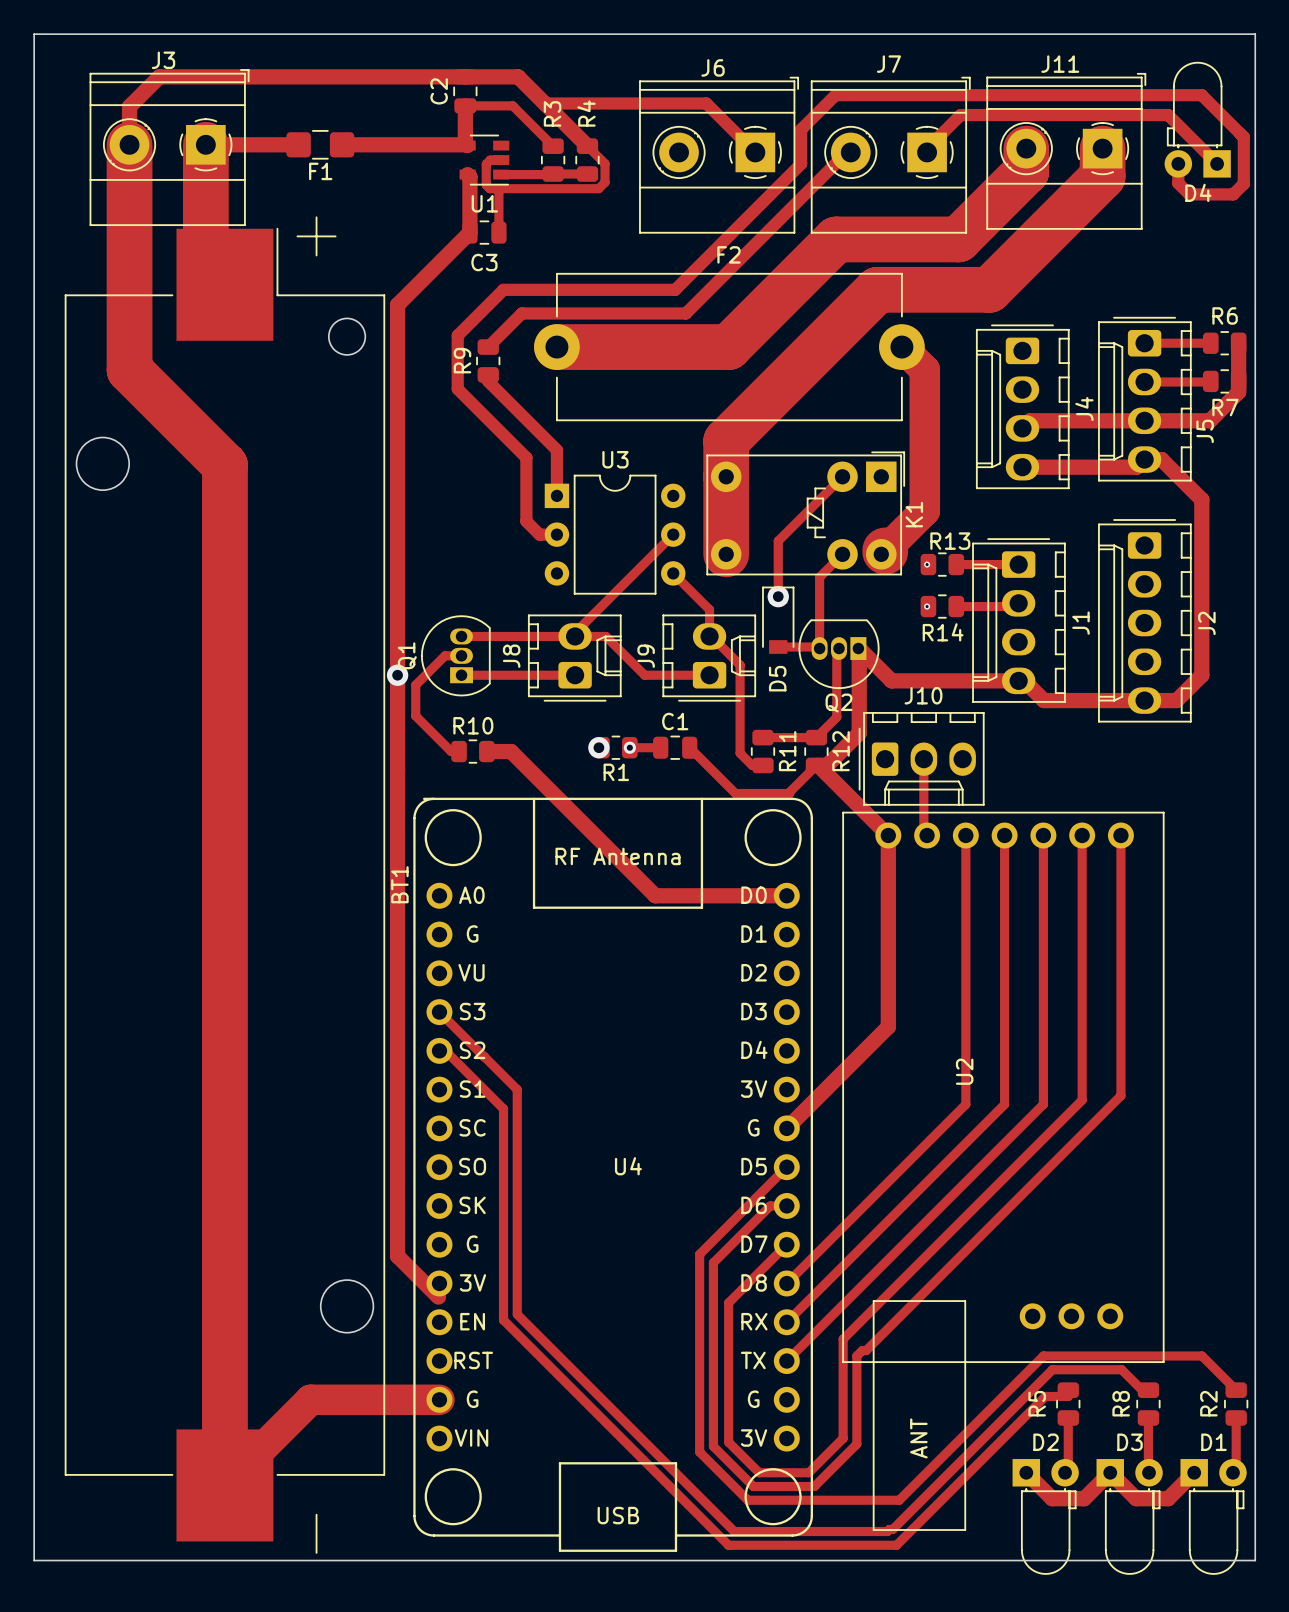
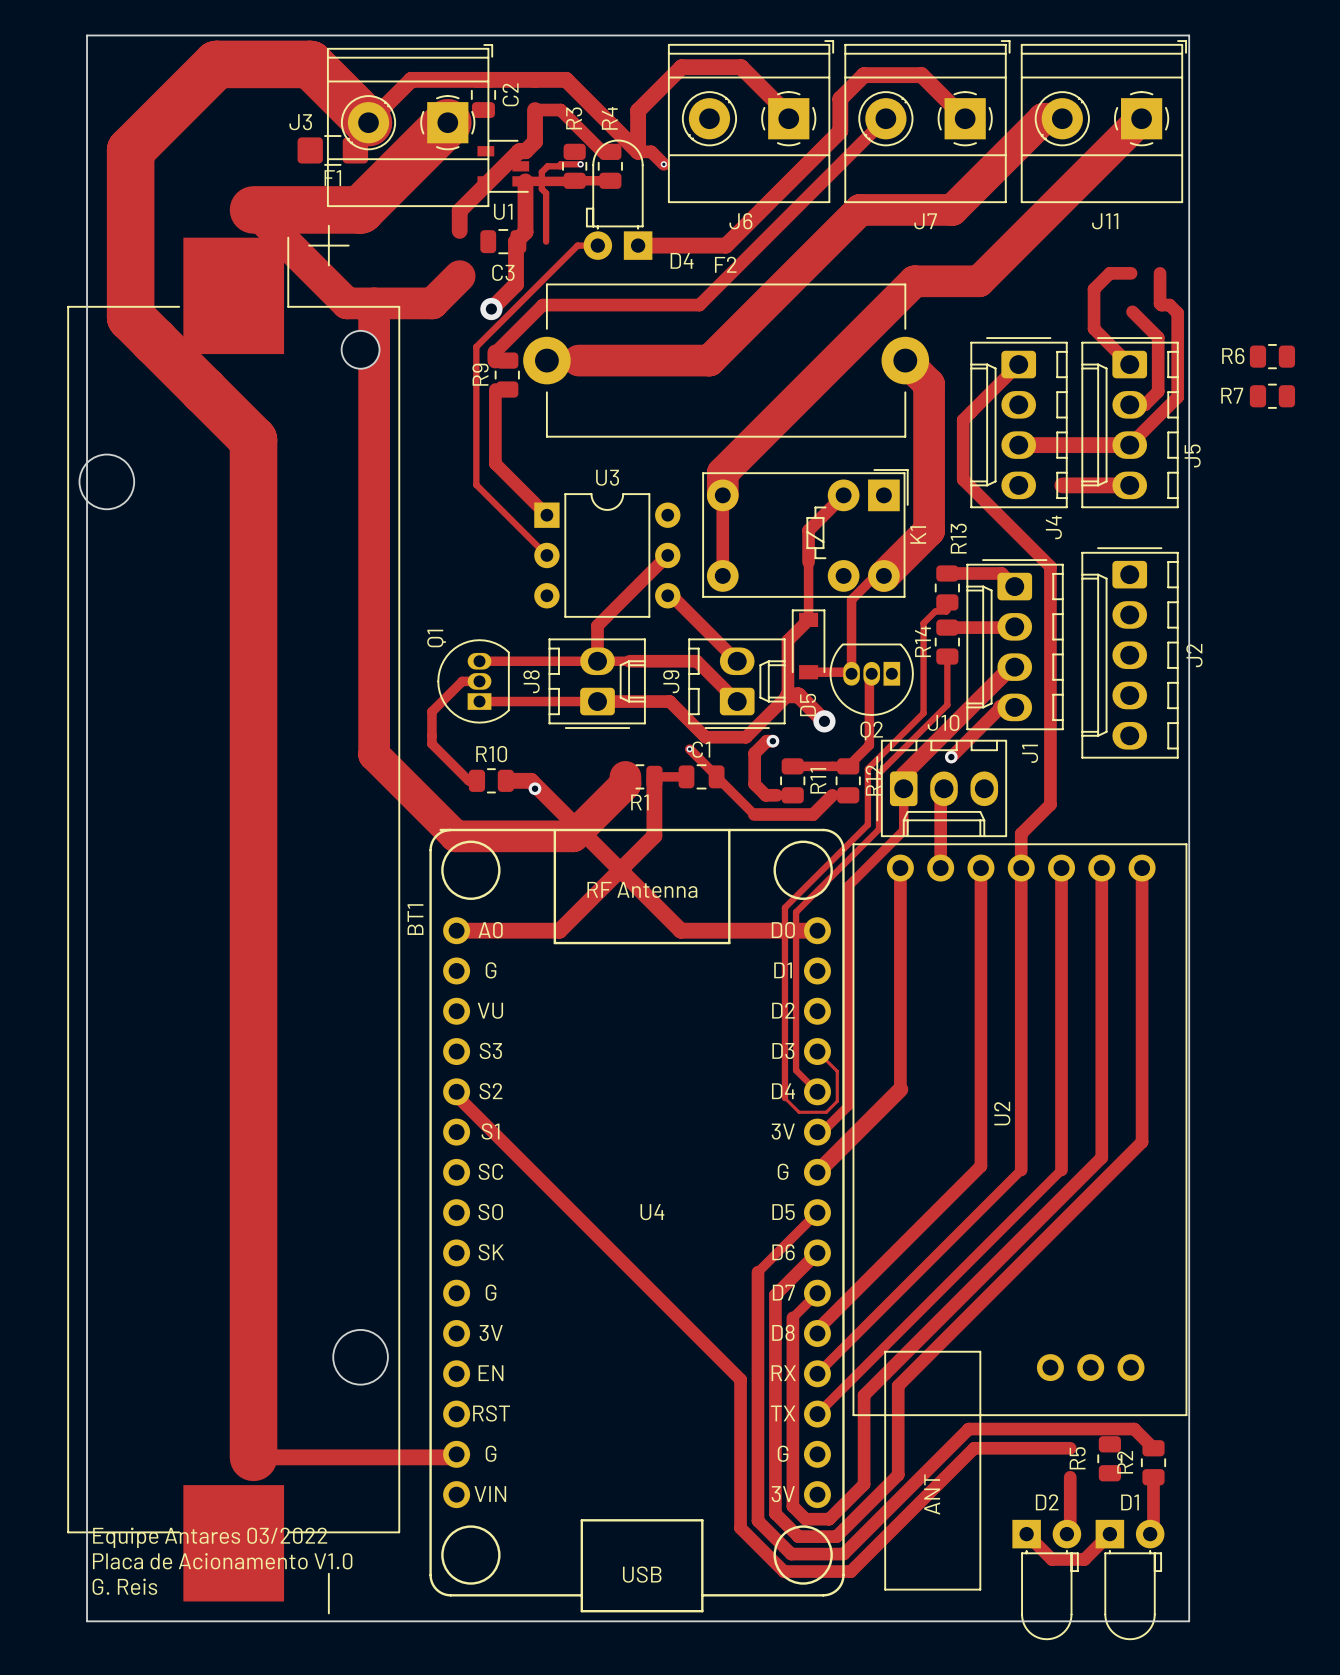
board edge: (83, 34) (34, 34) (34, 1560) (83, 1560) -> (87, 35) (87, 1621)
board edge: (1144, 34) (1255, 34) (1255, 1560) (1144, 1560) -> (1189, 35) (1189, 1621)
J3 name position: J3 (163, 60) -> J3 (300, 122)
J7 name position: J7 (888, 64) -> J7 (925, 221)
J11 name position: J11 (1060, 64) -> J11 (1105, 221)
J6 name position: J6 (713, 67) -> J6 (740, 221)
track: (395, 76) (159, 76) (129, 106) (129, 369) (224, 465) (224, 1485) (310, 1399) (439, 1399) -> (411, 79) (368, 122) (310, 64) (216, 64) (130, 150) (130, 317) (253, 440) (253, 1457) (453, 1457) (456, 1454)
track: (518, 76) (605, 163) (605, 182) (598, 188) (489, 188) (486, 185) (486, 164) (490, 160) (501, 160) -> (538, 79) (566, 79) (638, 151)
C2 name position: C2 (439, 91) -> C2 (510, 94)
track: (544, 103) (706, 103) (751, 148) -> none
track: none -> (788, 118) (788, 114) (741, 67) (681, 67) (638, 110) (638, 151)
track: none -> (885, 118) (699, 305) (542, 305) (495, 352) (495, 360)
track: none -> (965, 118) (921, 75) (864, 75) (840, 98) (840, 131) (725, 245) (638, 245) (642, 241)
track: none -> (1141, 118) (979, 281) (914, 281) (722, 472) (722, 575)
track: none -> (447, 122) (360, 209) (253, 209) (347, 303) (432, 303) (459, 276)
D4 position: (1197, 119) -> (617, 199)
track: (298, 144) (205, 144) (205, 265) (224, 284) -> none
track: (342, 144) (466, 144) -> none
track: (467, 145) (465, 143) (465, 105) (512, 105) (553, 146) -> none
track: none -> (602, 151) (560, 110) (535, 110) (535, 141) (525, 151) (519, 151) (459, 210) (459, 230)
track: none -> (638, 151) (651, 151) (663, 164)
J3 position: (169, 147) -> (410, 125)
track: (850, 148) (685, 313) (521, 313) (488, 347) -> none
track: (927, 148) (960, 115) (1168, 115) (1217, 163) -> none
track: (1026, 148) (1026, 171) (958, 239) (836, 239) (728, 347) (682, 347) -> (1062, 118) (1043, 118) (952, 209) (860, 209) (709, 360)
track: (1102, 148) (1102, 176) (989, 289) (877, 289) (726, 441) (726, 554) -> none
J11 position: (1066, 151) -> (1103, 121)
J6 position: (719, 155) -> (751, 121)
J7 position: (890, 155) -> (927, 121)
track: none -> (580, 164) (547, 166) (541, 172) (541, 188) (546, 193) (546, 241)
via: none -> (580, 164)
via: none -> (663, 164)
track: (1178, 163) (1178, 183) (1189, 194) (1233, 194) (1243, 183) (1243, 137) (1201, 95) (835, 95) (801, 129) (801, 163) (675, 289) (503, 289) (457, 335) (457, 389) (526, 457) (526, 521) (539, 534) (556, 534) -> none
track: (467, 174) (469, 176) (469, 232) (397, 304) (397, 1256) (438, 1297) -> none
track: none -> (525, 181) (525, 232) (515, 241) (515, 284) (491, 309)
track: (493, 188) (498, 193) (498, 232) -> none
D4 name position: D4 (1198, 192) -> D4 (682, 260)
track: none -> (597, 245) (577, 245) (476, 346) (476, 484) (546, 555)
track: none -> (1131, 273) (1109, 273) (1094, 289) (1094, 328) (1129, 364)
track: none -> (1160, 273) (1160, 303) (1169, 305) (1177, 313) (1177, 397) (1129, 445) (1018, 445)
track: none -> (374, 303) (374, 754) (455, 836) (573, 836) (625, 784) (625, 776)
via: none -> (491, 309)
track: none -> (1132, 311) (1158, 337) (1158, 391) (1144, 404) (1129, 404)
R6 name position: R6 (1225, 315) -> R6 (1233, 356)
track: (1144, 343) (1210, 343) -> none
track: (1238, 343) (1238, 392) (1209, 420) (1030, 420) (1022, 428) -> none
track width: thick (556, 347) (682, 347) -> thin (578, 360) (709, 360)
F2 position: (729, 347) -> (726, 360)
track: none -> (905, 360) (929, 384) (929, 530) (883, 575)
track: (901, 347) (924, 369) (924, 510) (885, 551) -> none
track: none -> (495, 389) (495, 463) (546, 515)
track: (488, 374) (488, 381) (556, 450) (556, 495) -> none
track: (1210, 381) (1144, 382) -> none
J5 position: (1144, 399) -> (1130, 422)
J4 position: (1022, 406) -> (1019, 422)
R7 name position: R7 (1225, 407) -> R7 (1232, 395)
J4 name position: J4 (1084, 409) -> J4 (1053, 527)
track: (1087, 467) (1136, 467) (1144, 459) (1161, 459) (1201, 499) (1201, 675) (1176, 700) (1044, 700) (1024, 680) (976, 680) -> none
track: (842, 476) (778, 541) -> (843, 495) (808, 530) (808, 562)
K1 position: (805, 513) -> (805, 533)
U3 position: (615, 534) -> (607, 555)
track: none -> (667, 555) (597, 625) (597, 661)
track: (673, 534) (575, 632) -> none
track: none -> (947, 573) (1001, 573) (1014, 586)
via: (927, 564) -> none
R13 rotation: 0° (942, 564) -> 90° clockwise (947, 587)
R13 position: (942, 564) -> (947, 587)
track: (956, 564) (1018, 564) -> none
track: none -> (667, 595) (671, 595) (737, 661)
track: (673, 573) (709, 609) (709, 636) (740, 665) (740, 753) (752, 765) (763, 765) -> none
track: none -> (947, 602) (946, 611) (935, 611) (923, 623) (923, 713) (867, 768) (867, 824) (784, 907) (784, 1098) (799, 1112) (826, 1112) (837, 1101) (837, 1071) (817, 1051)
track: none -> (808, 619) (787, 640) (787, 695)
via: (778, 596) -> none
track: none -> (1014, 626) (947, 627)
track: (1018, 603) (1015, 606) (956, 606) -> none
via: (927, 606) -> none
R14 rotation: 0° (942, 606) -> 90° clockwise (947, 642)
R14 position: (942, 606) -> (947, 642)
J1 position: (1018, 620) -> (1015, 644)
J2 position: (1144, 620) -> (1130, 652)
J1 name position: J1 (1080, 623) -> J1 (1030, 753)
track: none -> (947, 656) (947, 705) (878, 773) (878, 829) (796, 912) (796, 1070) (817, 1091)
track: (605, 636) (644, 675) (709, 675) -> (629, 661) (696, 661) (737, 701)
track: none -> (1014, 667) (1011, 667) (903, 774) (903, 830) (848, 886) (848, 1105) (822, 1132) (817, 1132)
Q1 name position: Q1 (407, 655) -> Q1 (436, 638)
track: none -> (787, 695) (798, 695) (824, 721)
track: none -> (787, 695) (746, 737) (705, 737) (669, 701) (597, 701)
via: (397, 675) -> none
track: (963, 680) (891, 680) (859, 648) (859, 733) (827, 765) (816, 765) (789, 793) (735, 793) (725, 783) -> (832, 795) (813, 814) (754, 814)
track: none -> (1000, 707) (951, 757)
via: none -> (824, 721)
track: none -> (772, 741) (766, 741) (754, 753) (754, 784) (765, 795) (776, 795)
via: none -> (772, 741)
track: none -> (689, 749) (716, 776)
via: none -> (689, 749)
via: none -> (951, 757)
via: (598, 747) -> none
track: none -> (654, 776) (654, 835) (559, 930) (456, 930)
via: (629, 747) -> none
J10 position: (921, 758) -> (941, 788)
via: none -> (535, 788)
track: none -> (944, 788) (940, 792) (940, 868)
track: (923, 759) (923, 832) (927, 835) -> none
track: (818, 765) (888, 835) (888, 1026) (866, 1048) -> (900, 868) (900, 1089)
track: (965, 835) (965, 1104) (786, 1283) -> (980, 868) (980, 1166) (817, 1329) (817, 1333)
track: (1004, 835) (1004, 1104) (982, 1126) -> (1018, 364) (963, 420) (963, 479) (1050, 566) (1050, 804) (1021, 833) (1021, 1170)
track: (1043, 835) (1043, 1104) (1021, 1126) -> (1061, 868) (1061, 1170)
track: (1082, 835) (1082, 1100) (843, 1339) (843, 1438) (808, 1472) (759, 1472) (728, 1442) (728, 1302) (763, 1268) -> (1101, 868) (1101, 1157) (864, 1395) (864, 1484) (829, 1519) (805, 1519) (792, 1506) (792, 1317)
track: (1120, 835) (1120, 1095) (866, 1350) (862, 1350) (856, 1356) (856, 1444) (814, 1486) (753, 1486) (713, 1446) (713, 1262) (770, 1205) (786, 1205) -> (1142, 868) (1142, 1142) (898, 1385) (898, 1474) (836, 1536) (798, 1536) (775, 1513) (775, 1294) (817, 1252)
track: (439, 1012) (484, 1056) -> none
track: none -> (456, 1091) (456, 1095) (740, 1379) (740, 1528) (783, 1571) (850, 1571) (974, 1448) (1070, 1448)
track: (445, 1050) (503, 1108) (503, 1320) (728, 1545) (896, 1545) (1045, 1396) (1068, 1396) (1068, 1390) -> none
track: (484, 1056) (517, 1089) (517, 1314) (734, 1531) (887, 1531) (892, 1529) (1052, 1369) (1121, 1369) (1142, 1390) (1149, 1390) -> none
U2 position: (1003, 1171) -> (1019, 1216)
track: (729, 1224) (699, 1254) (699, 1452) (747, 1500) (899, 1500) (1043, 1356) (1202, 1356) (1236, 1390) -> (757, 1272) (757, 1520) (791, 1554) (843, 1554) (968, 1429) (1134, 1429) (1153, 1448)
R8: (1148, 1404) -> none
R2 position: (1236, 1404) -> (1153, 1462)
track: (1068, 1418) (1068, 1469) -> none
track: (1148, 1418) (1149, 1472) -> none
track: (1236, 1418) (1236, 1469) (1232, 1472) -> (1153, 1477) (1153, 1530) (1150, 1534)
track: none -> (1070, 1477) (1070, 1530) (1066, 1534)
track: (1026, 1472) (1052, 1498) (1084, 1498) (1110, 1472) (1136, 1498) (1168, 1498) (1194, 1472) -> none
track: none -> (1026, 1534) (1052, 1559) (1084, 1559) (1109, 1534)
text: none -> Equipe Antares 03/2022 (210, 1537)
text: none -> Placa de Acionamento V1.0 (222, 1561)
D2 position: (1045, 1516) -> (1046, 1580)
D3: (1129, 1516) -> none
D1 position: (1213, 1516) -> (1130, 1580)
text: none -> G. Reis (124, 1586)

